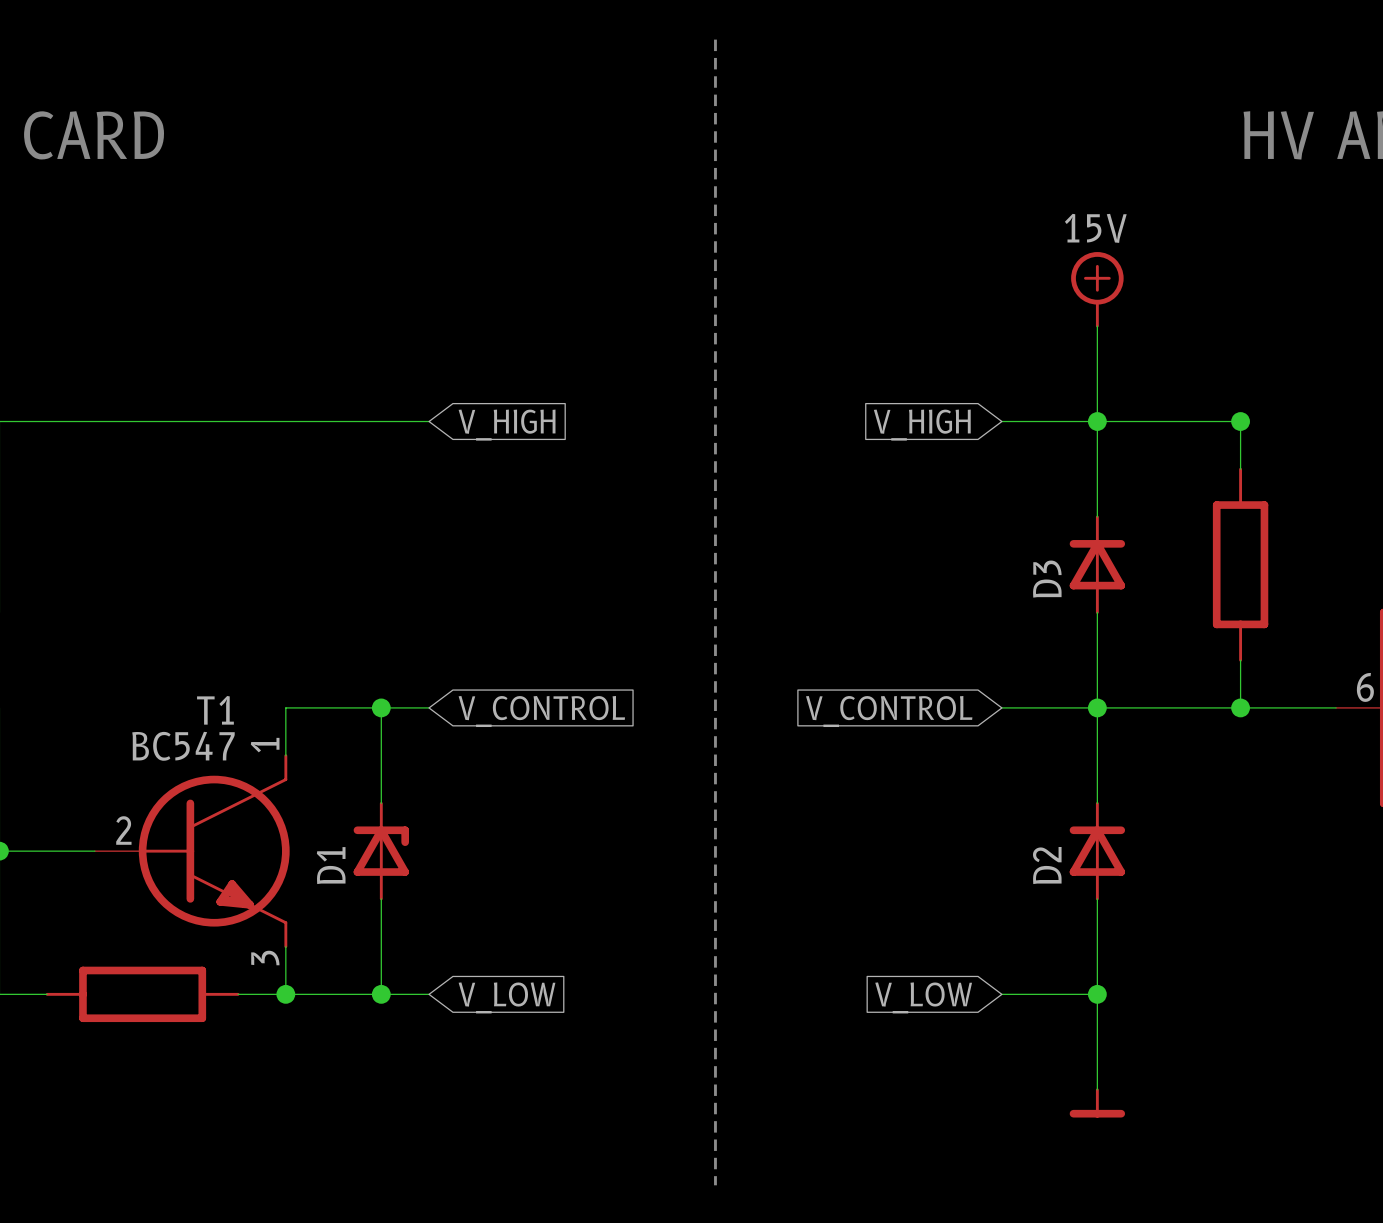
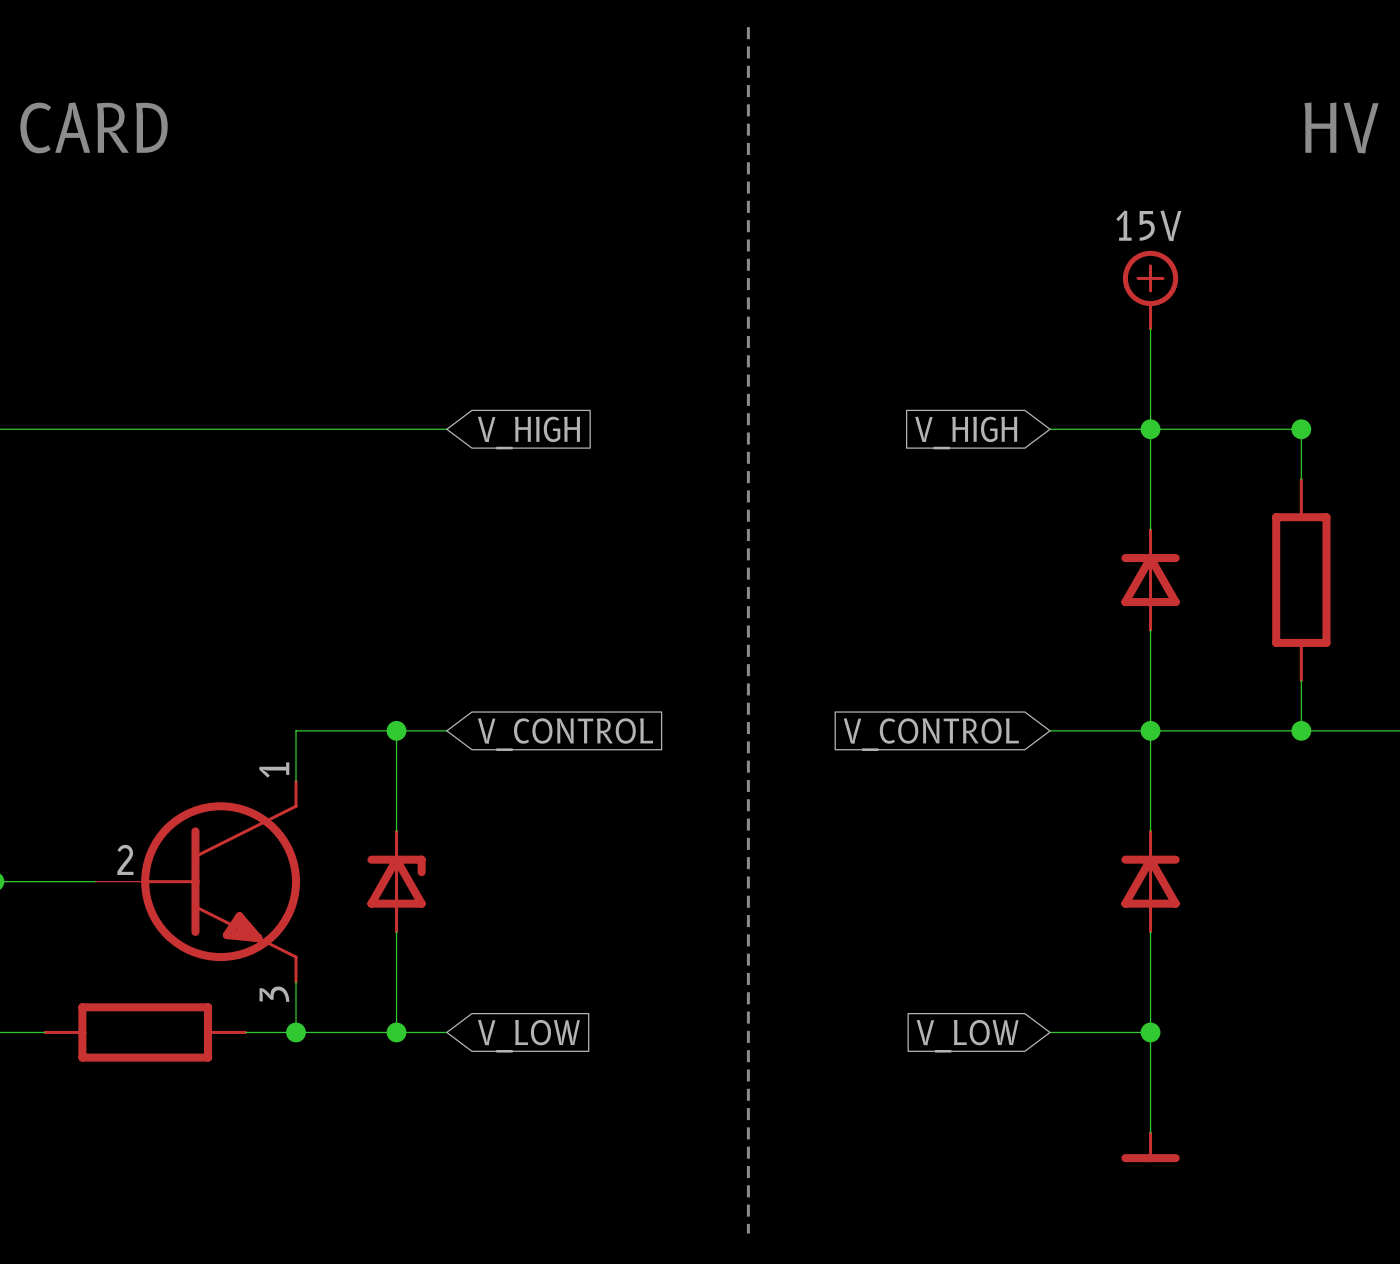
D3 name: D3 (1047, 579) -> none
T1 name: T1 (215, 710) -> none
T1 value: BC547 (183, 746) -> none
D1 name: D1 (331, 865) -> none
D2 name: D2 (1047, 865) -> none

